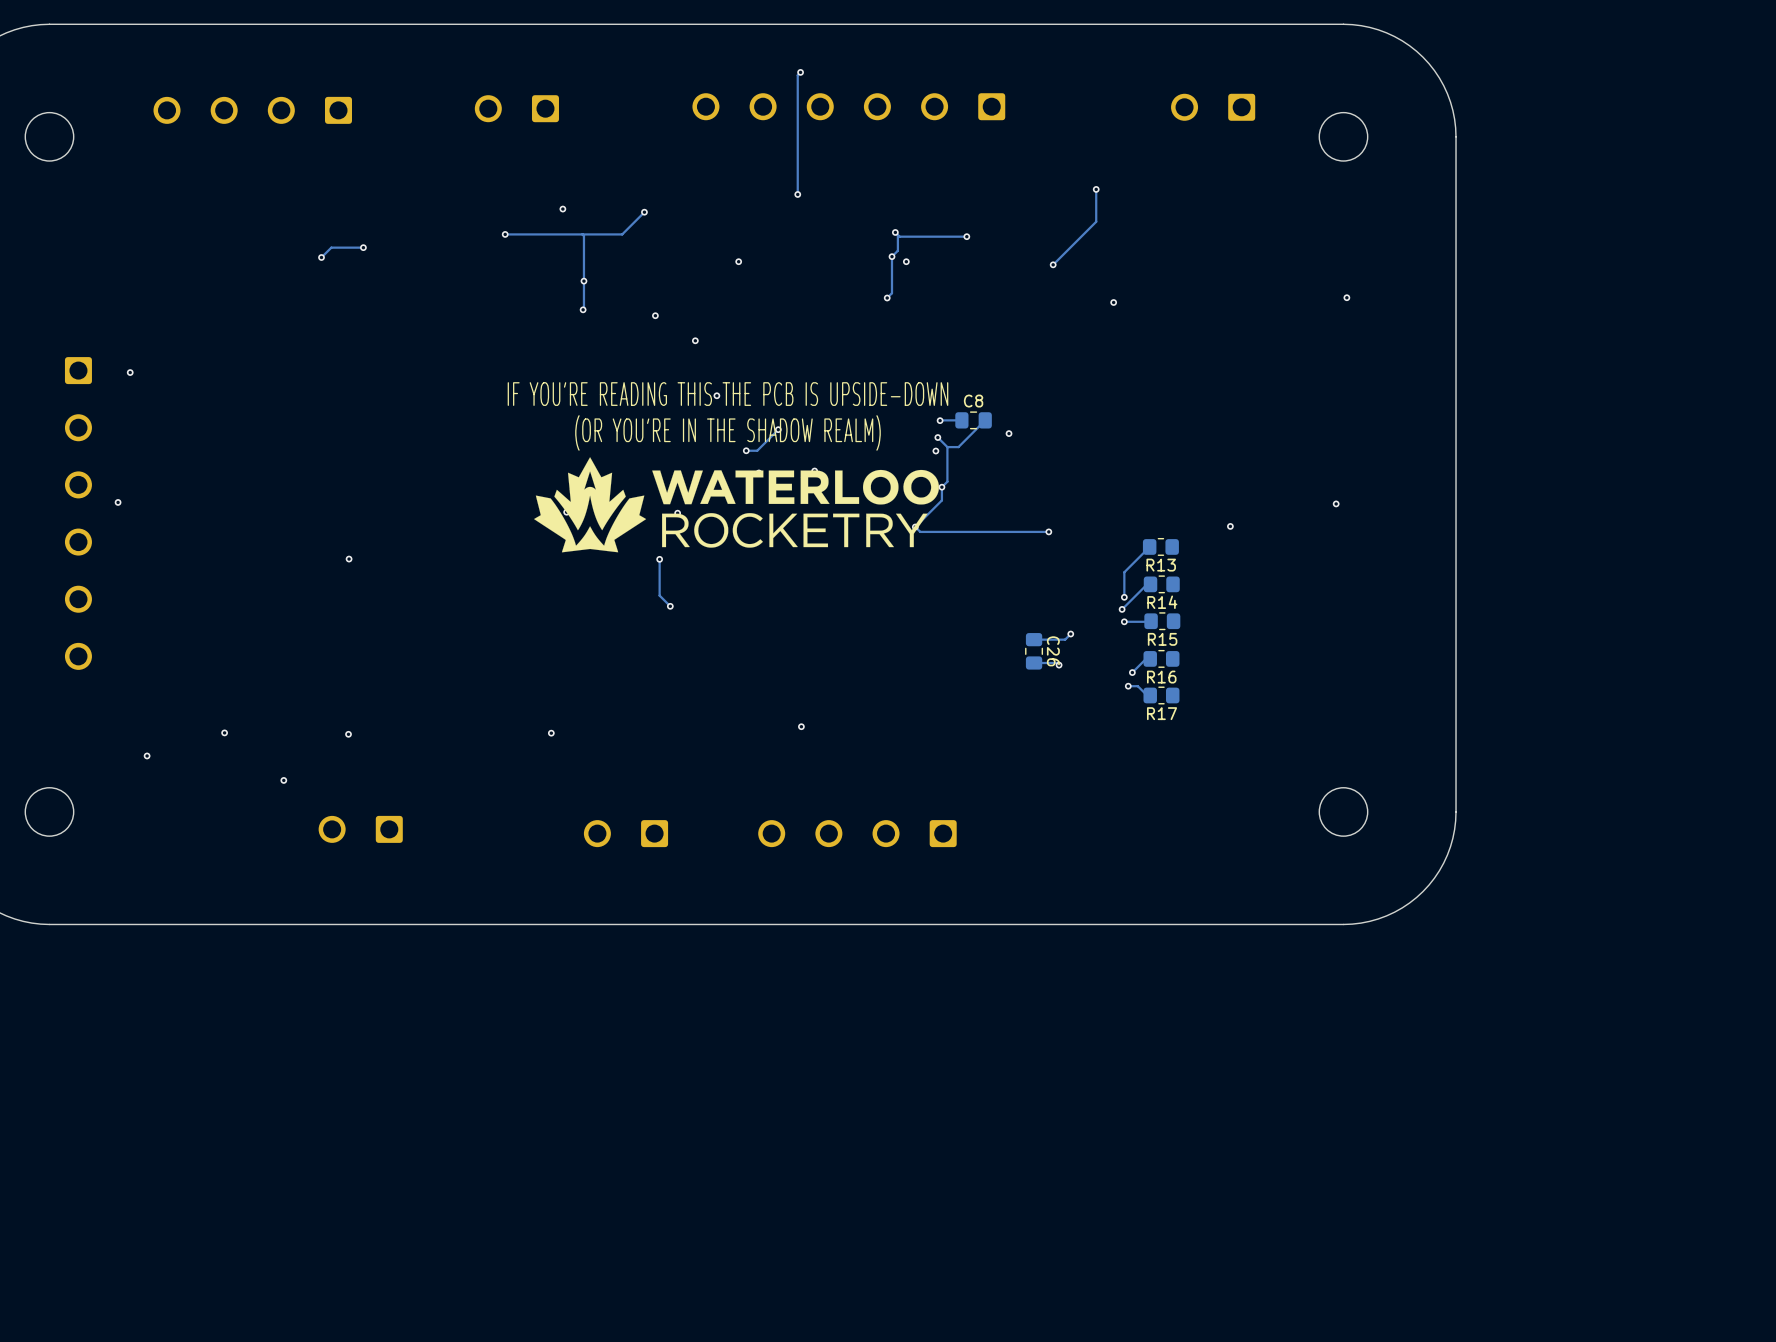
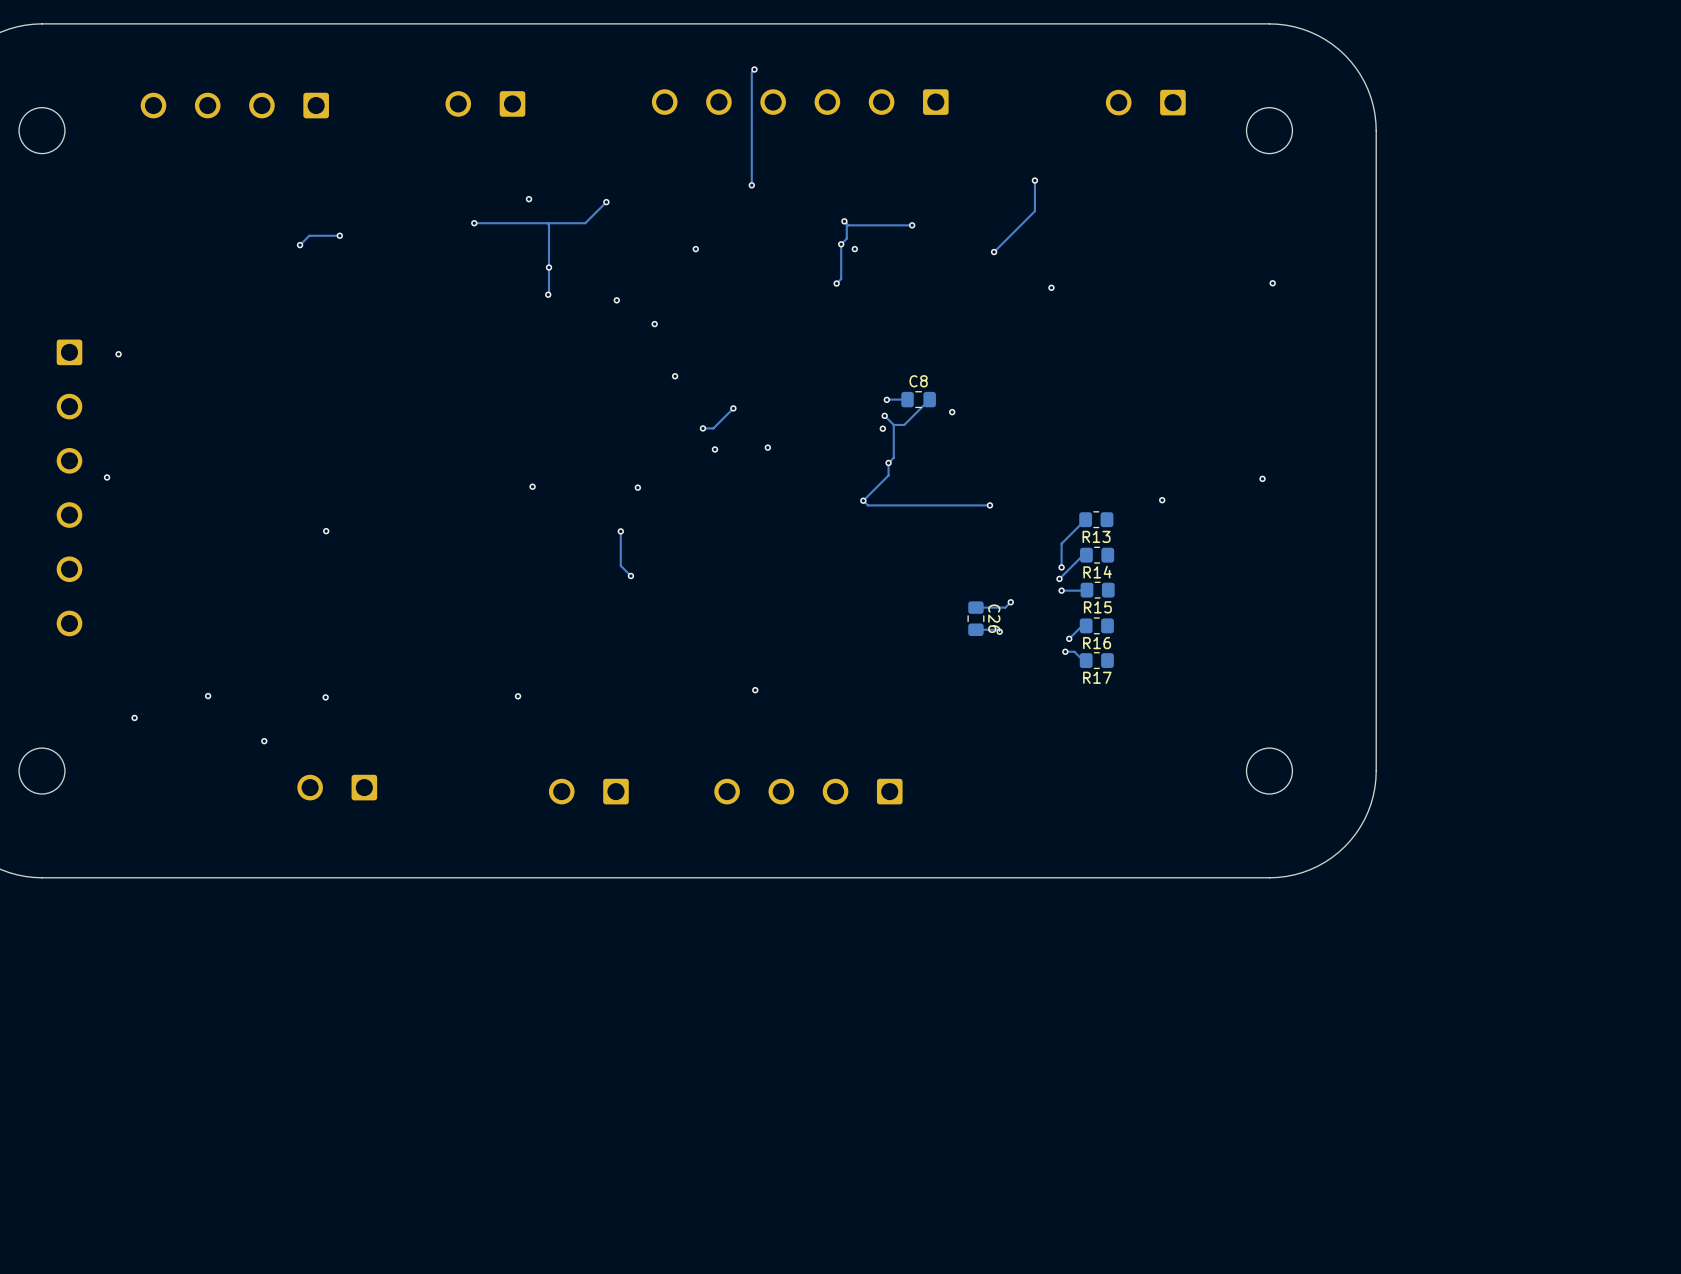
text: IF YOU'RE READING THIS THE PCB IS UPSIDE-DOWN (727, 394) -> none
text: (OR YOU'RE IN THE SHADOW REALM) (727, 432) -> none
drawing: [534, 457, 939, 553] -> none

